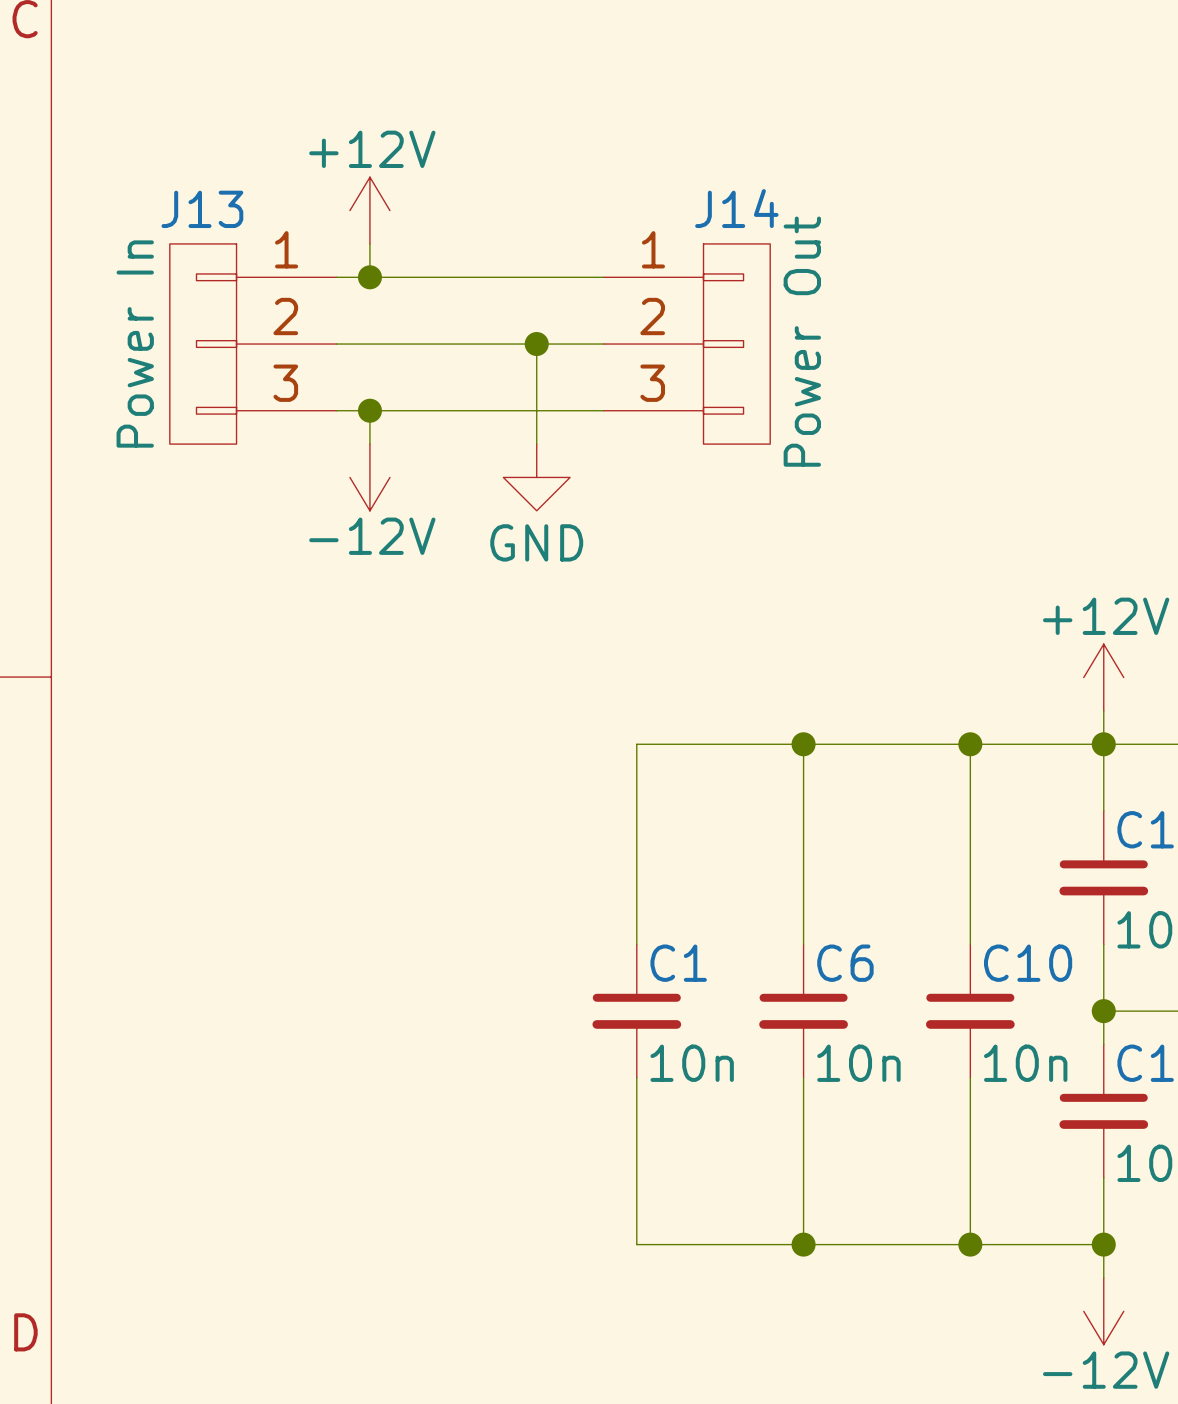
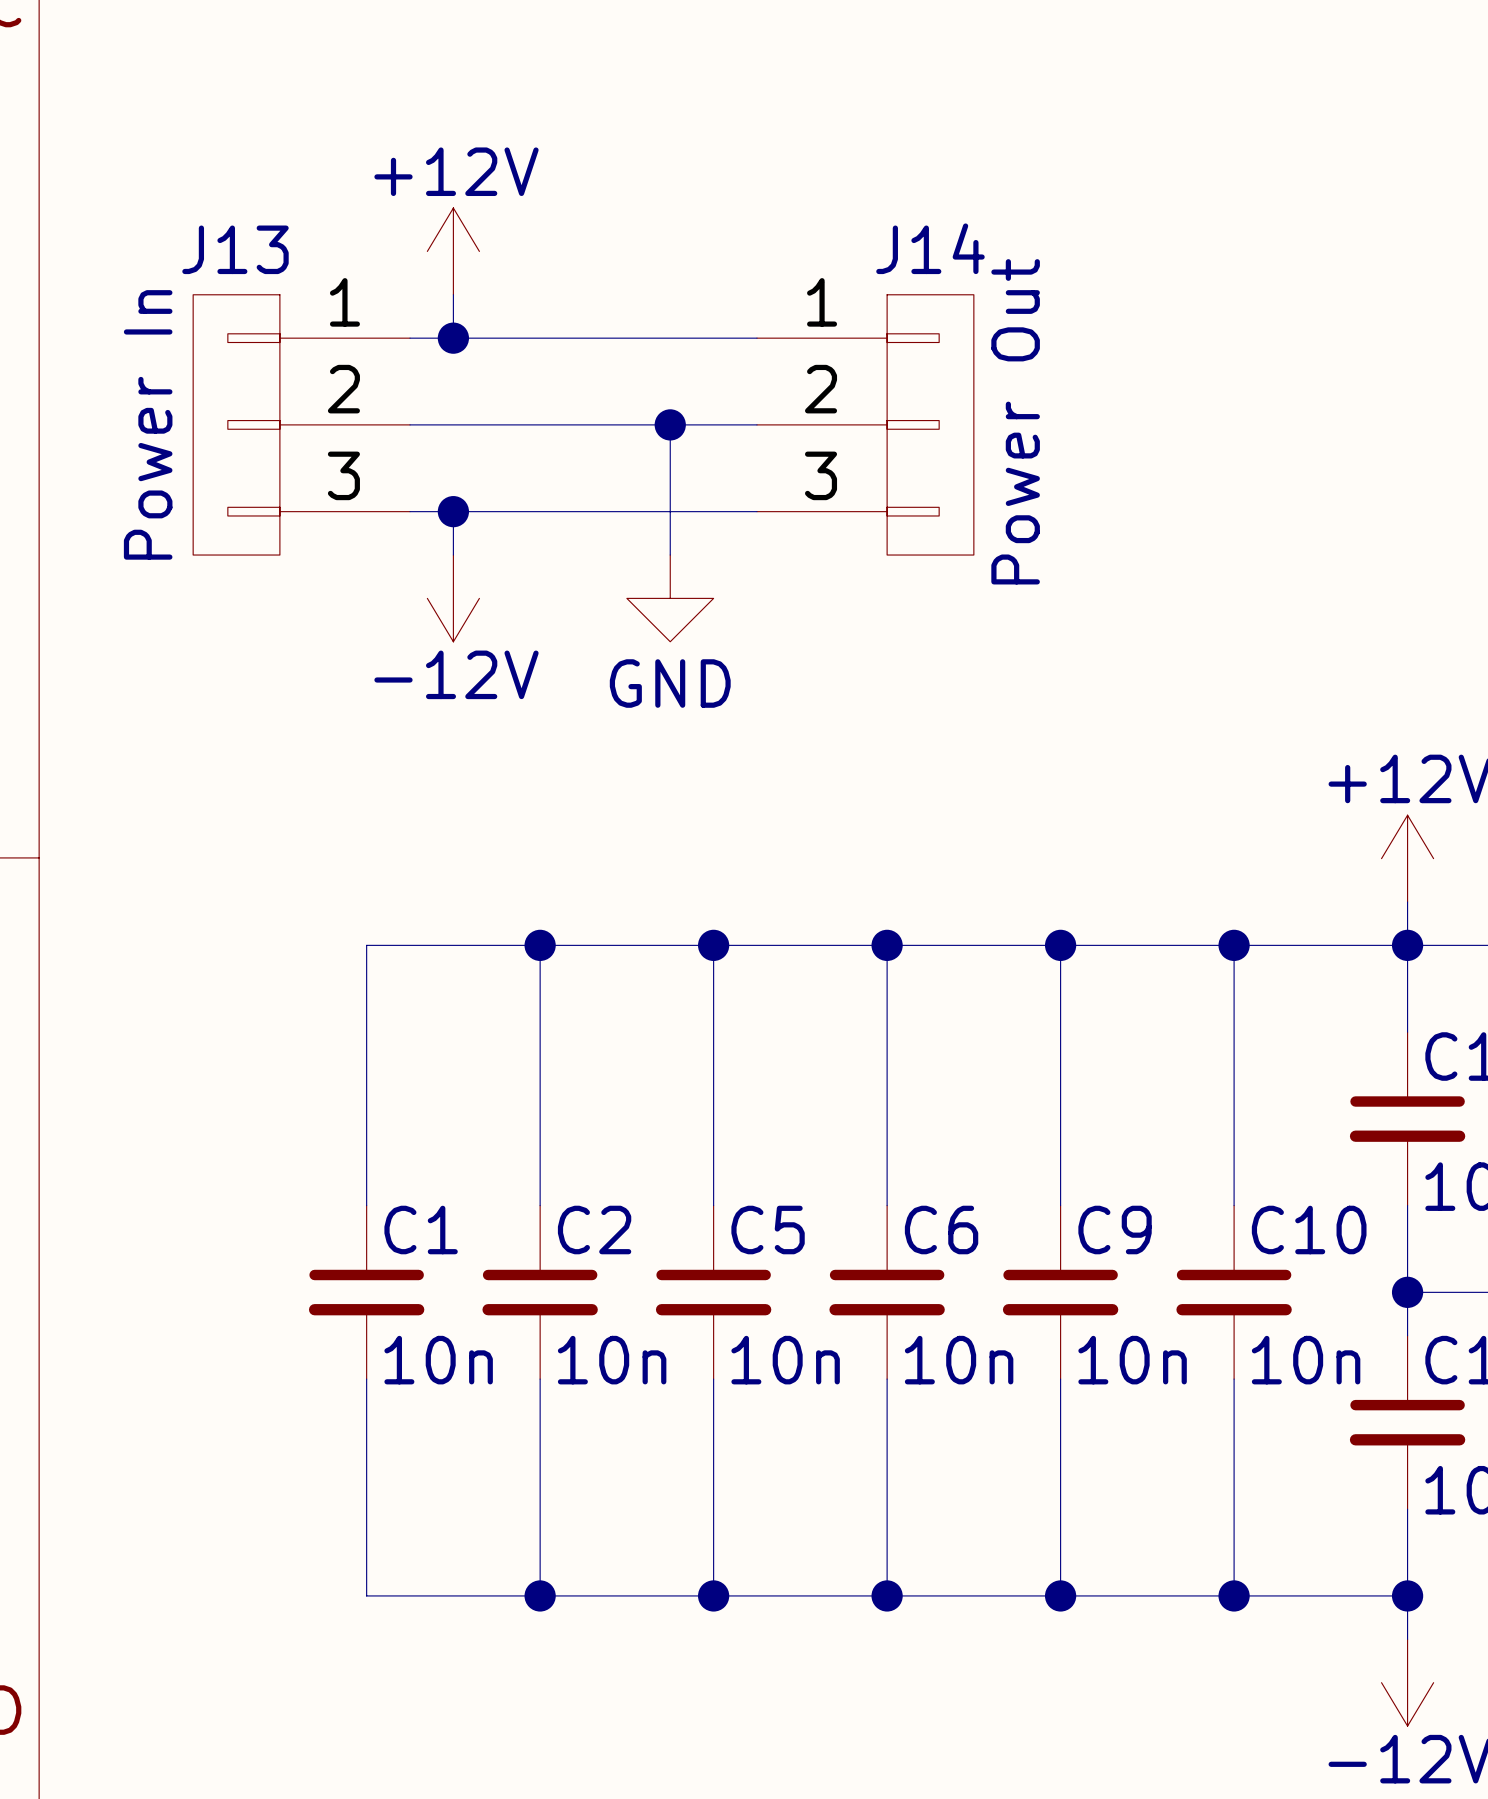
wire: none -> (540, 945) (540, 1205)
junction: none -> (540, 945)
wire: none -> (713, 945) (713, 1205)
junction: none -> (713, 945)
wire: (636, 744) (636, 944) -> (800, 945) (366, 945) (366, 1205)
wire: none -> (887, 945) (887, 1205)
junction: none -> (887, 945)
wire: (803, 744) (803, 944) -> (1060, 945) (1060, 1205)
junction position: (803, 744) -> (1060, 945)
C2: none -> 10n (540, 1292)
C5: none -> 10n (713, 1292)
C1 position: (636, 1011) -> (366, 1292)
C6 position: (803, 1011) -> (887, 1292)
C9: none -> 10n (1060, 1292)
wire: none -> (540, 1379) (540, 1595)
wire: none -> (713, 1379) (713, 1595)
wire: (636, 1077) (636, 1244) -> (366, 1379) (366, 1595) (800, 1595)
wire: none -> (887, 1379) (887, 1595)
wire: (803, 1077) (803, 1244) -> (1060, 1379) (1060, 1595)
junction: none -> (540, 1595)
junction: none -> (713, 1595)
junction: none -> (887, 1595)
junction position: (803, 1244) -> (1060, 1595)

